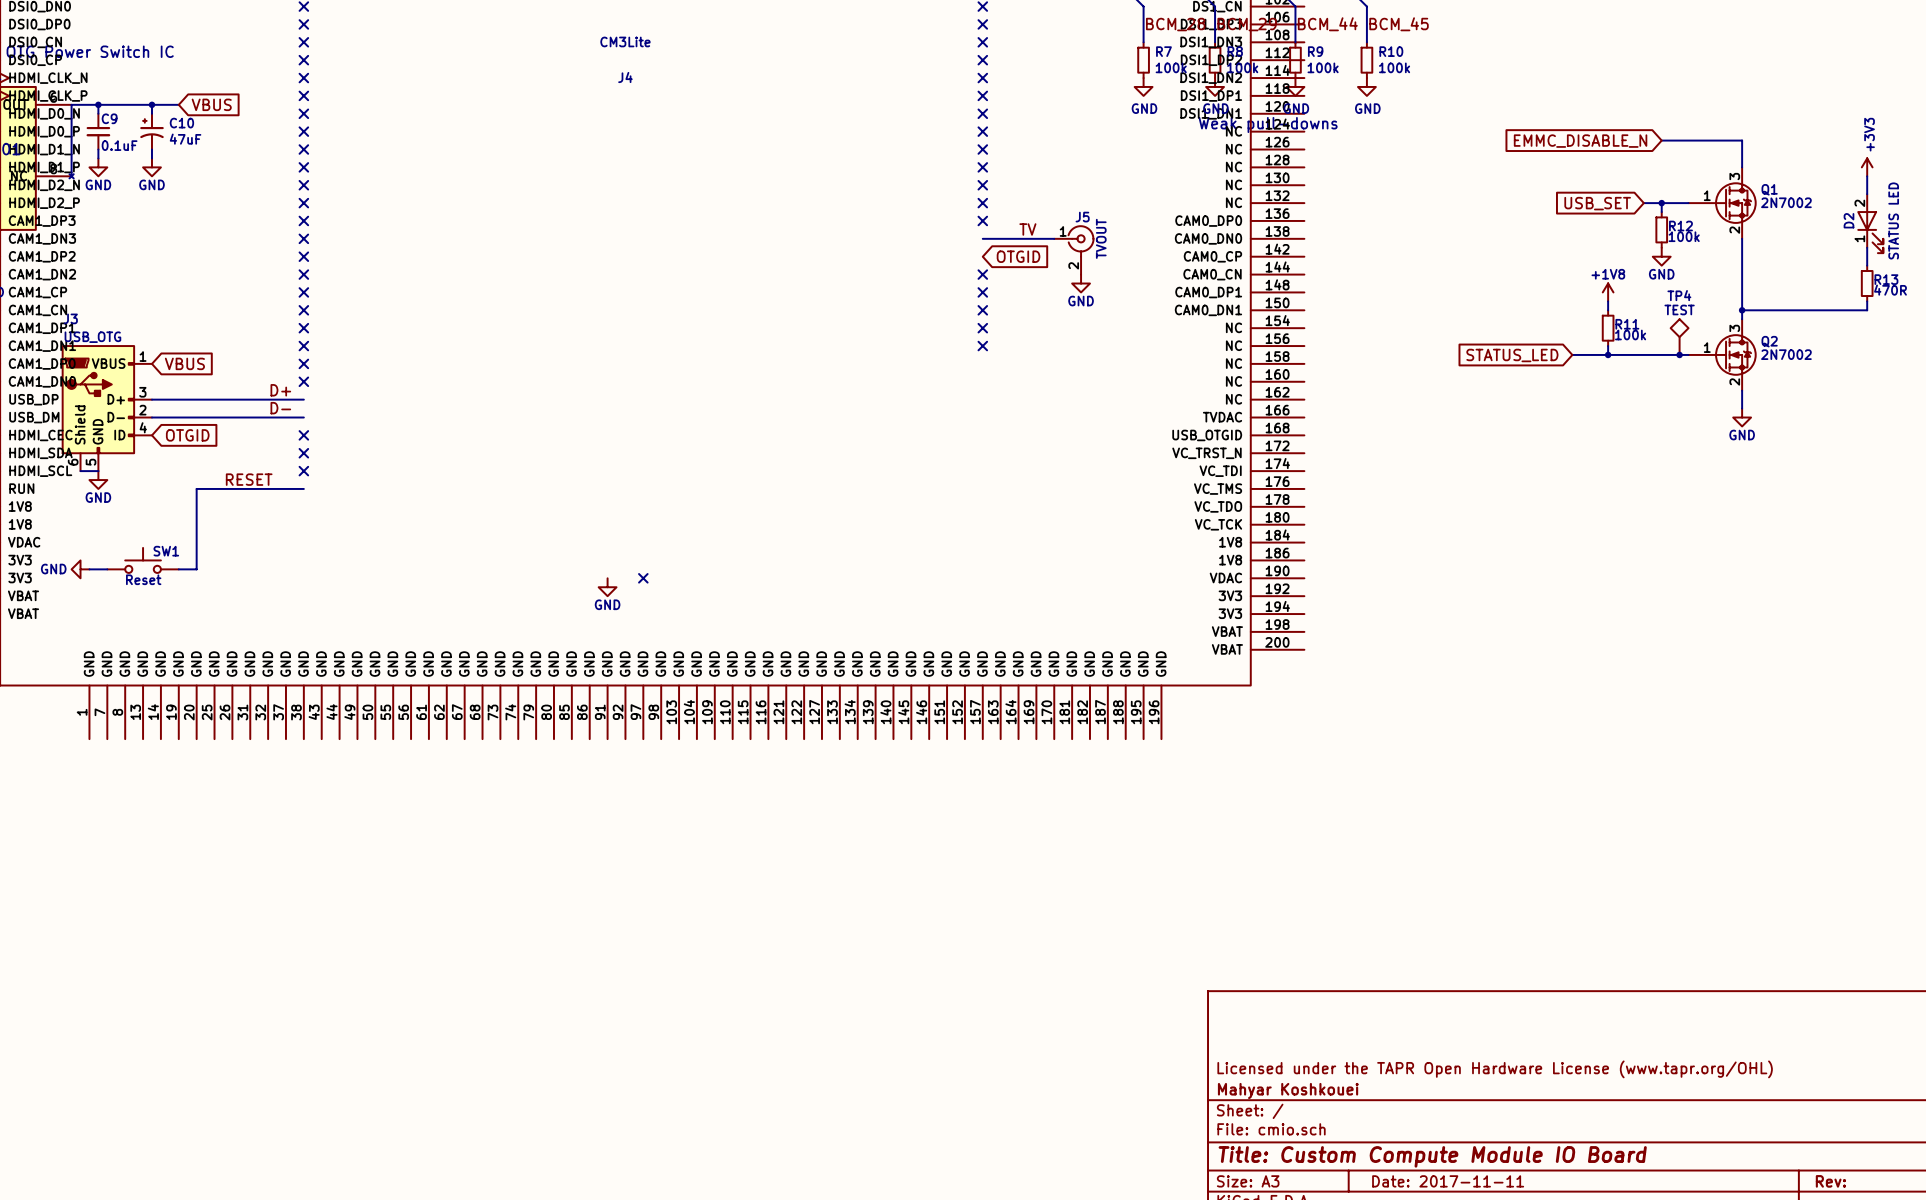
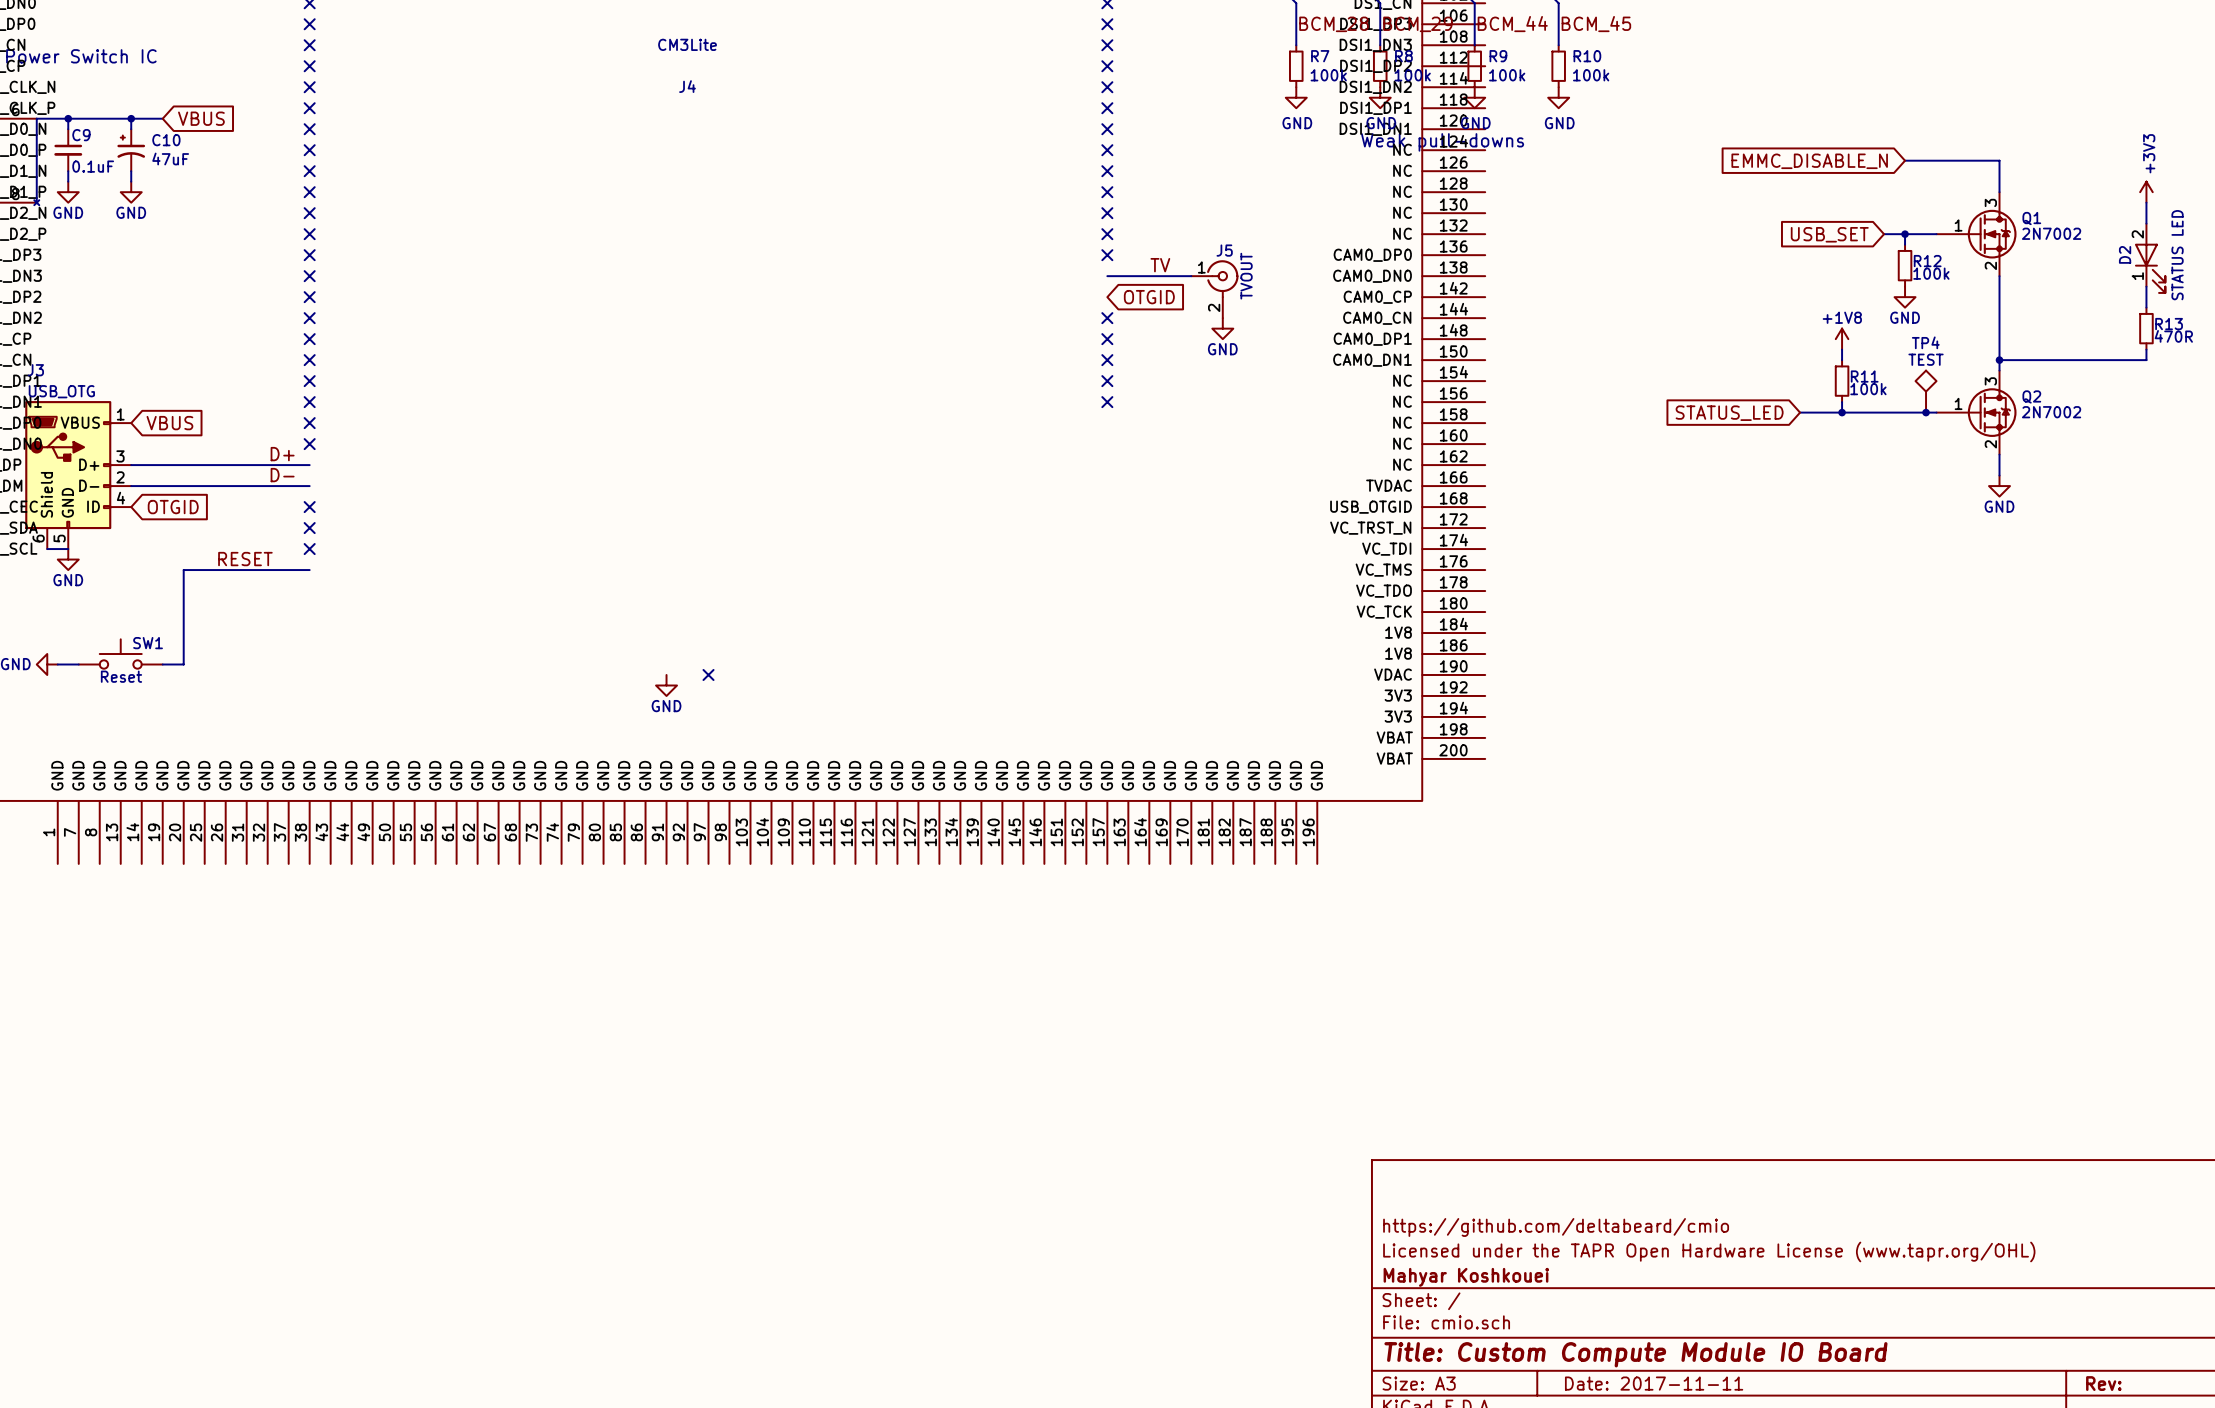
title block: none -> https://github.com/deltabeard/cmio (1556, 1227)

